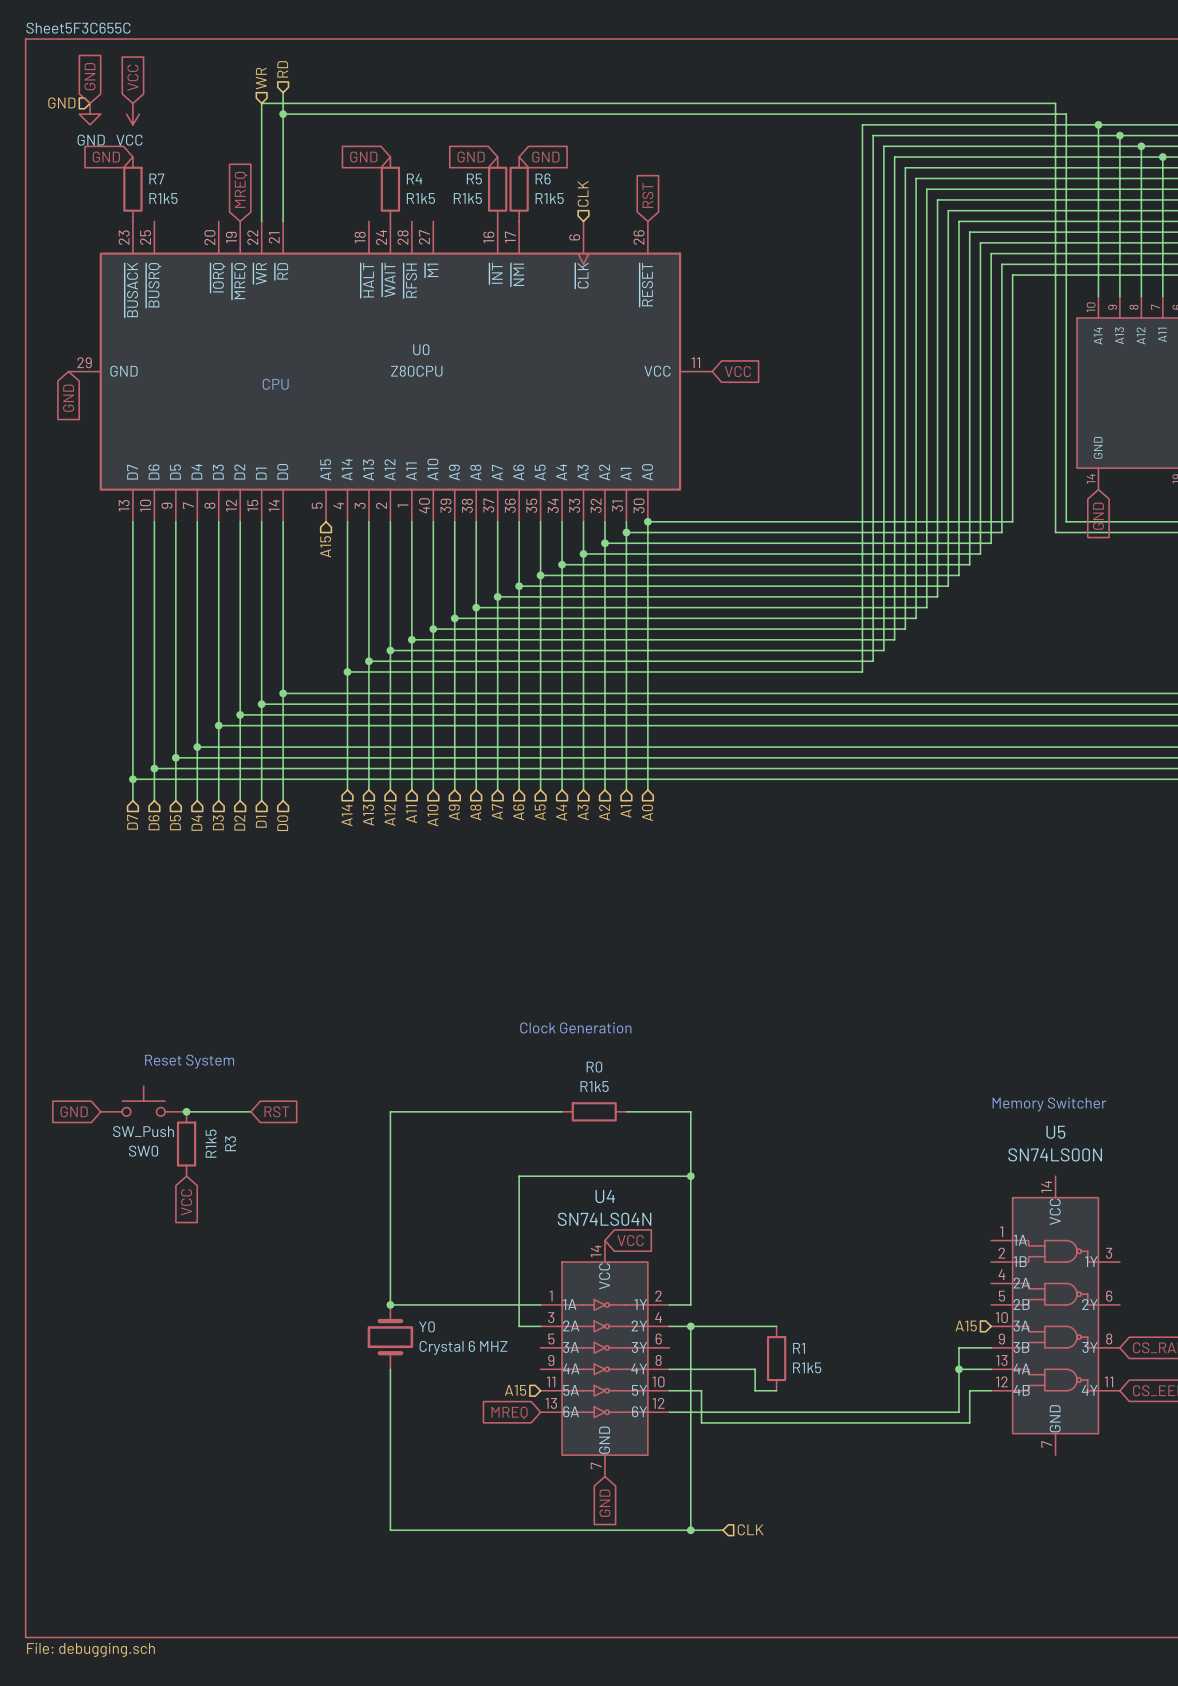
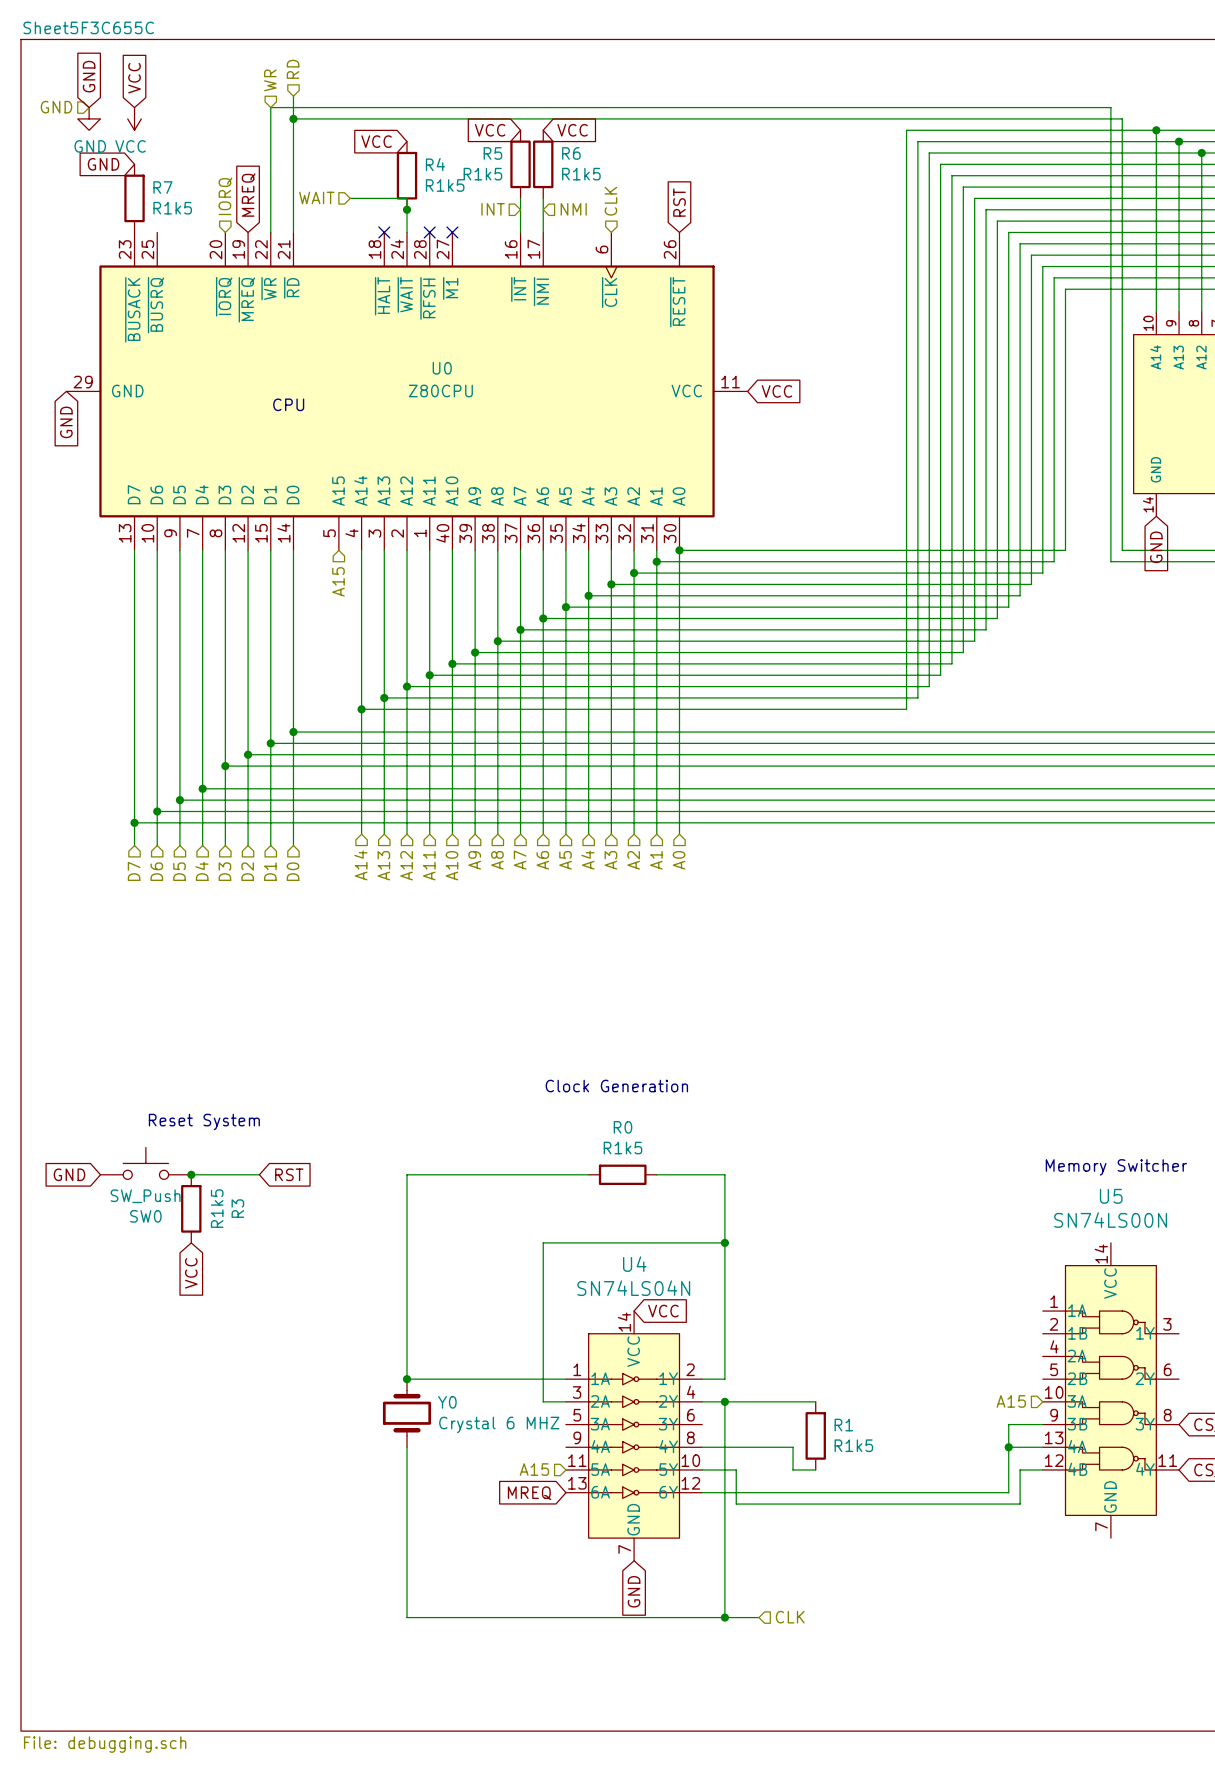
global label: none -> VCC (490, 130)
global label: none -> VCC (572, 130)
global label: none -> VCC (376, 141)
global label: GND (363, 157) -> none
global label: GND (471, 157) -> none
global label: GND (545, 157) -> none
hierarchical label: none -> WAIT (316, 197)
wire: none -> (350, 198) (407, 198) (407, 232)
R4 position: (390, 189) -> (407, 175)
wire: none -> (520, 198) (520, 232)
R5 position: (497, 189) -> (520, 164)
wire: none -> (543, 198) (543, 232)
R6 position: (519, 189) -> (543, 164)
hierarchical label: none -> IORQ (225, 196)
junction: none -> (407, 209)
hierarchical label: none -> INT (493, 209)
hierarchical label: none -> NMI (573, 209)
no-connect mark: none -> (384, 232)
no-connect mark: none -> (429, 232)
no-connect mark: none -> (452, 232)

